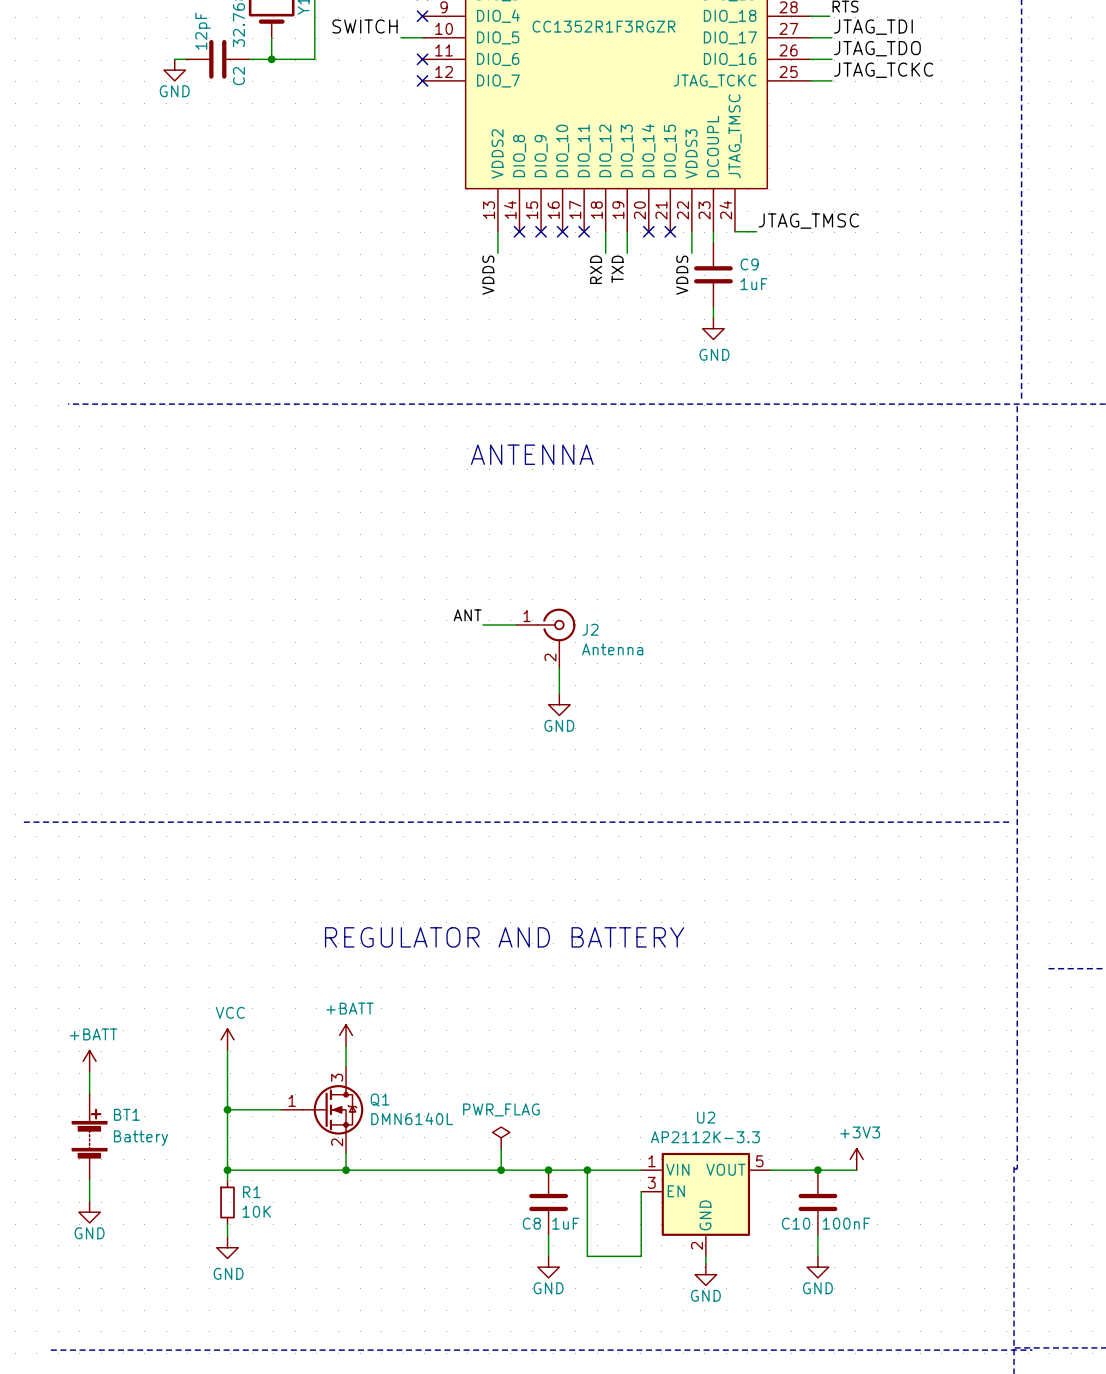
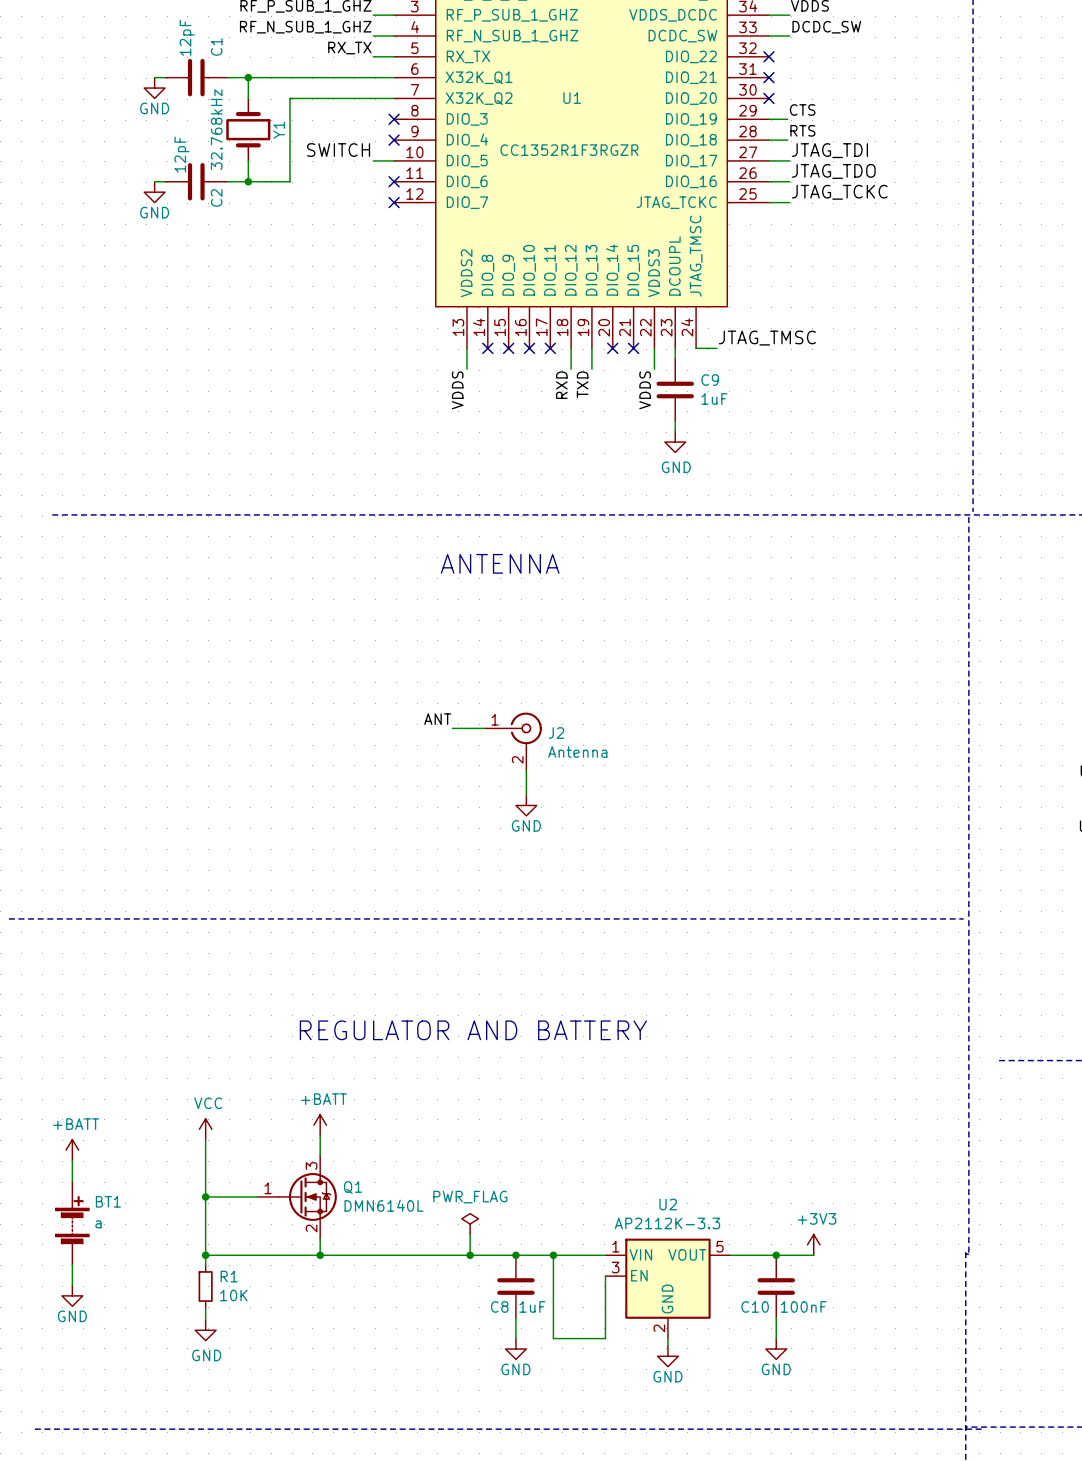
BT1 value: Battery (140, 1138) -> a (98, 1224)

